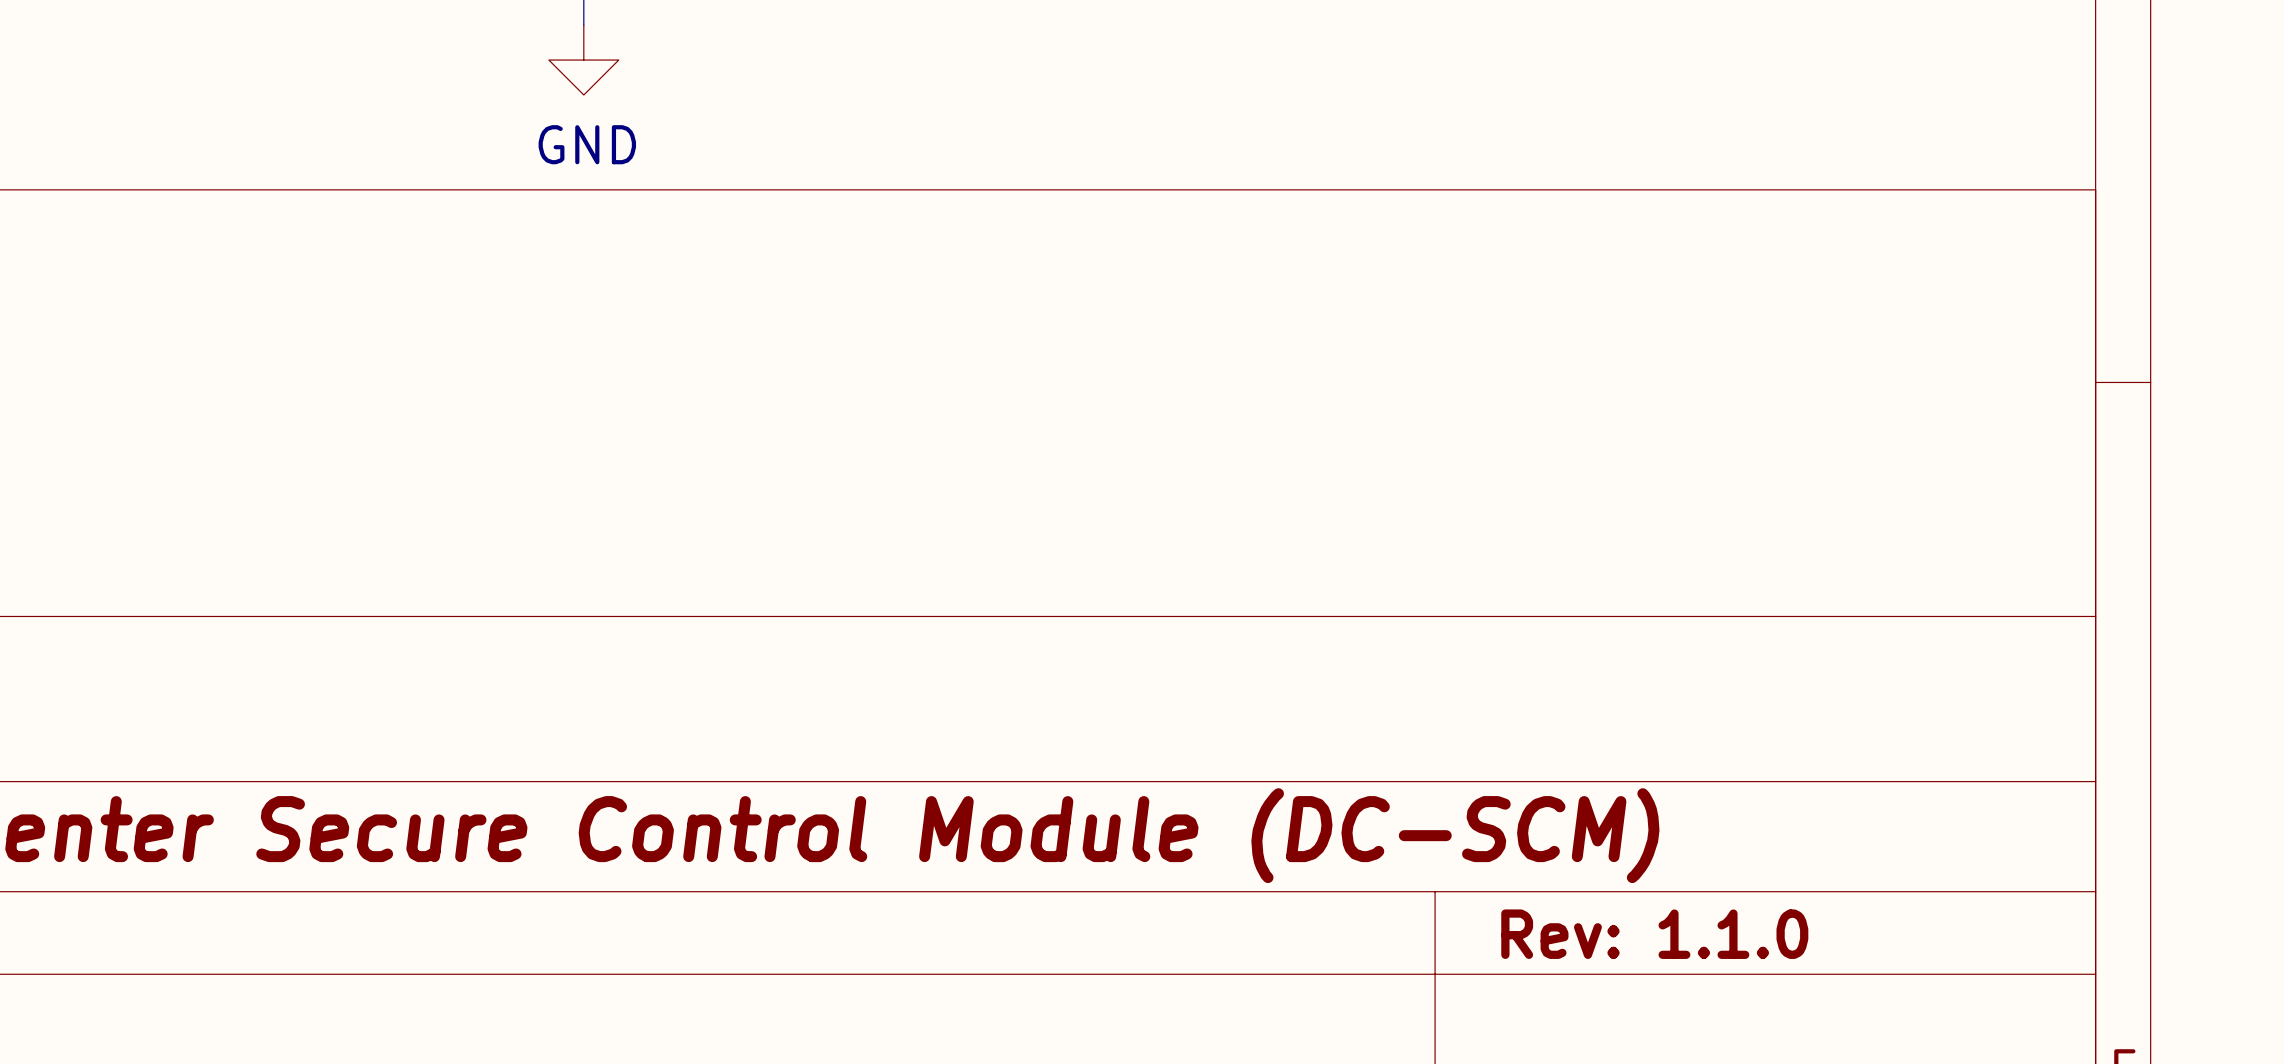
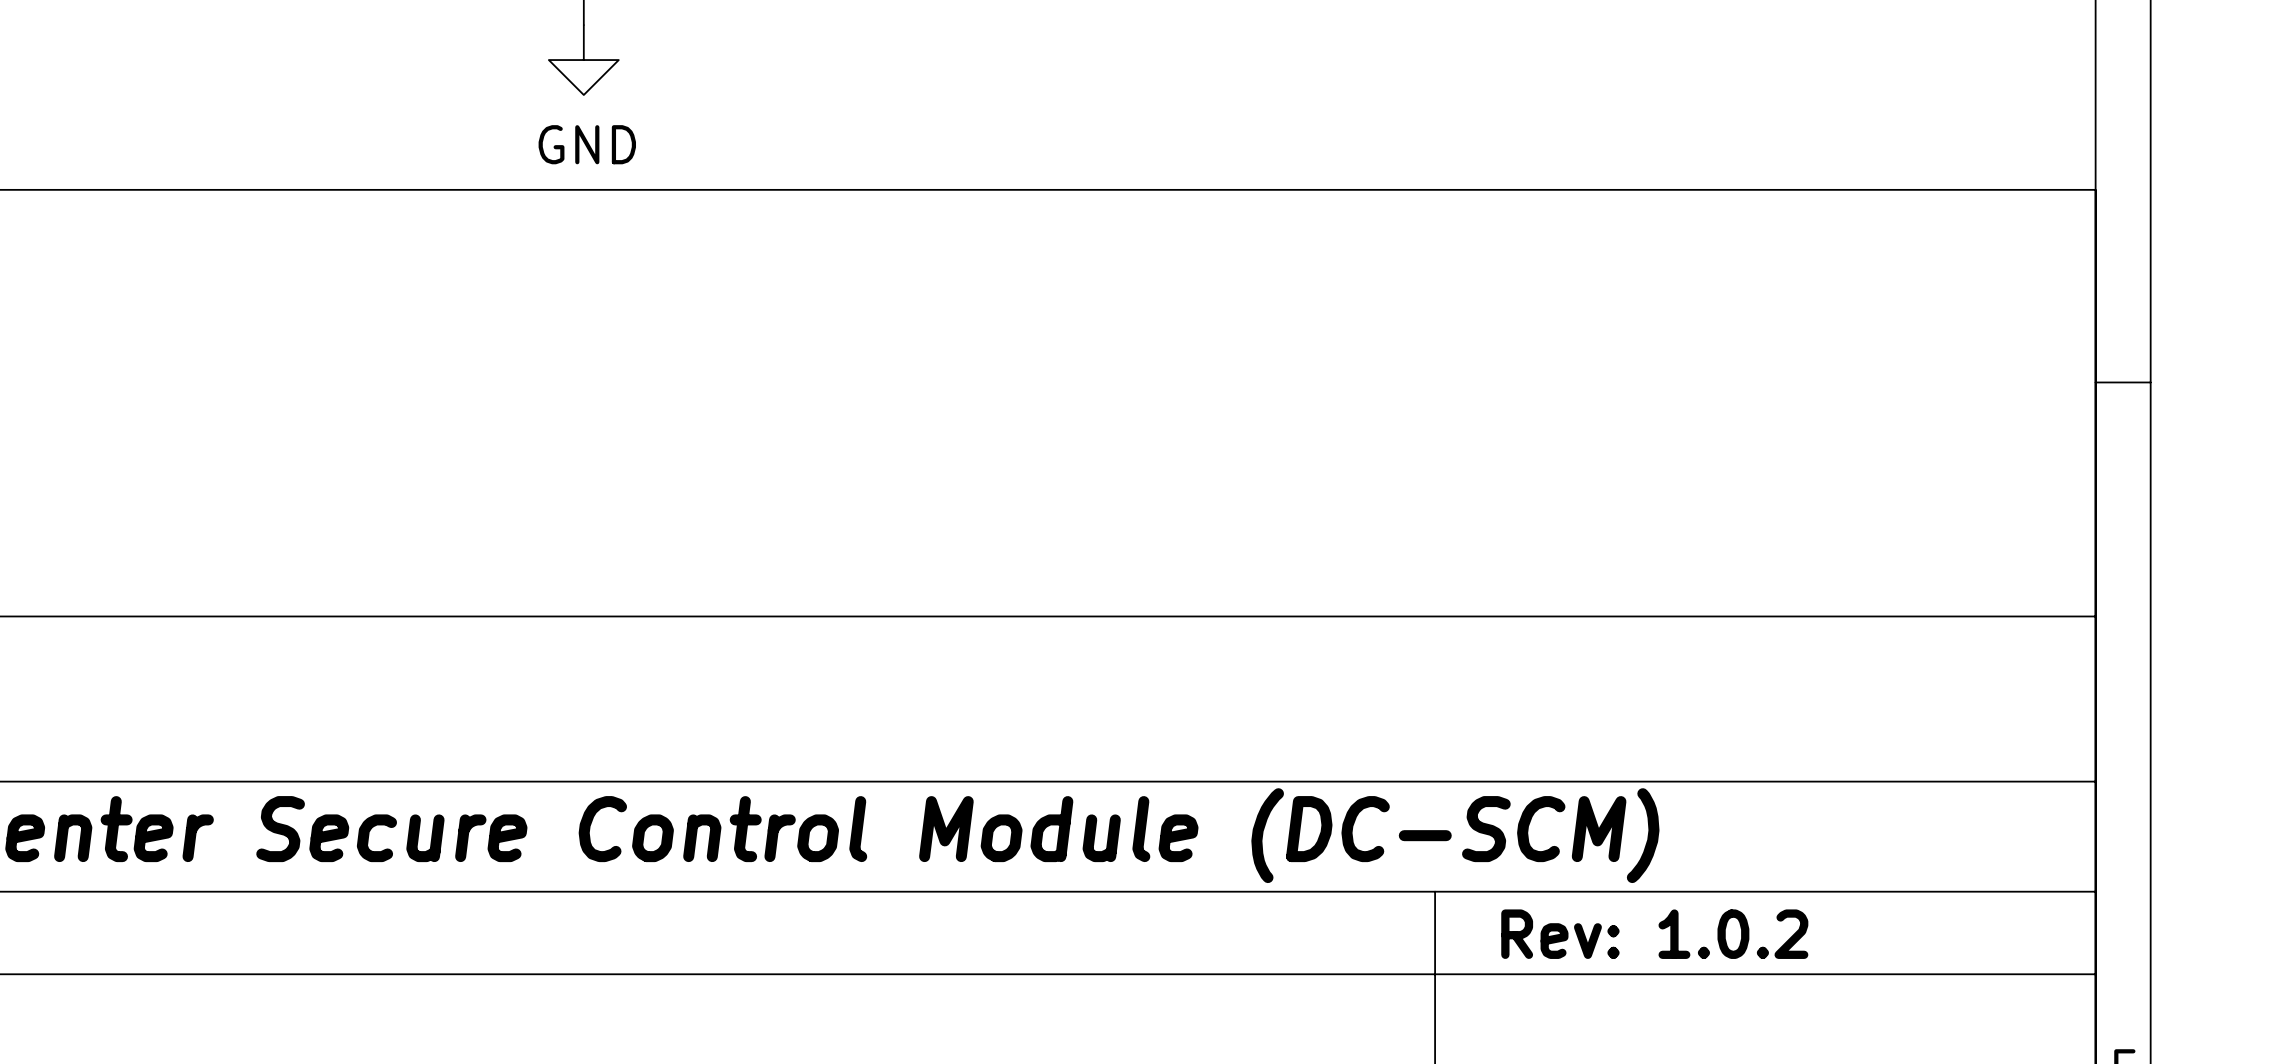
title block: Rev: 1.1.0 (1654, 934) -> Rev: 1.0.2 (1654, 934)

